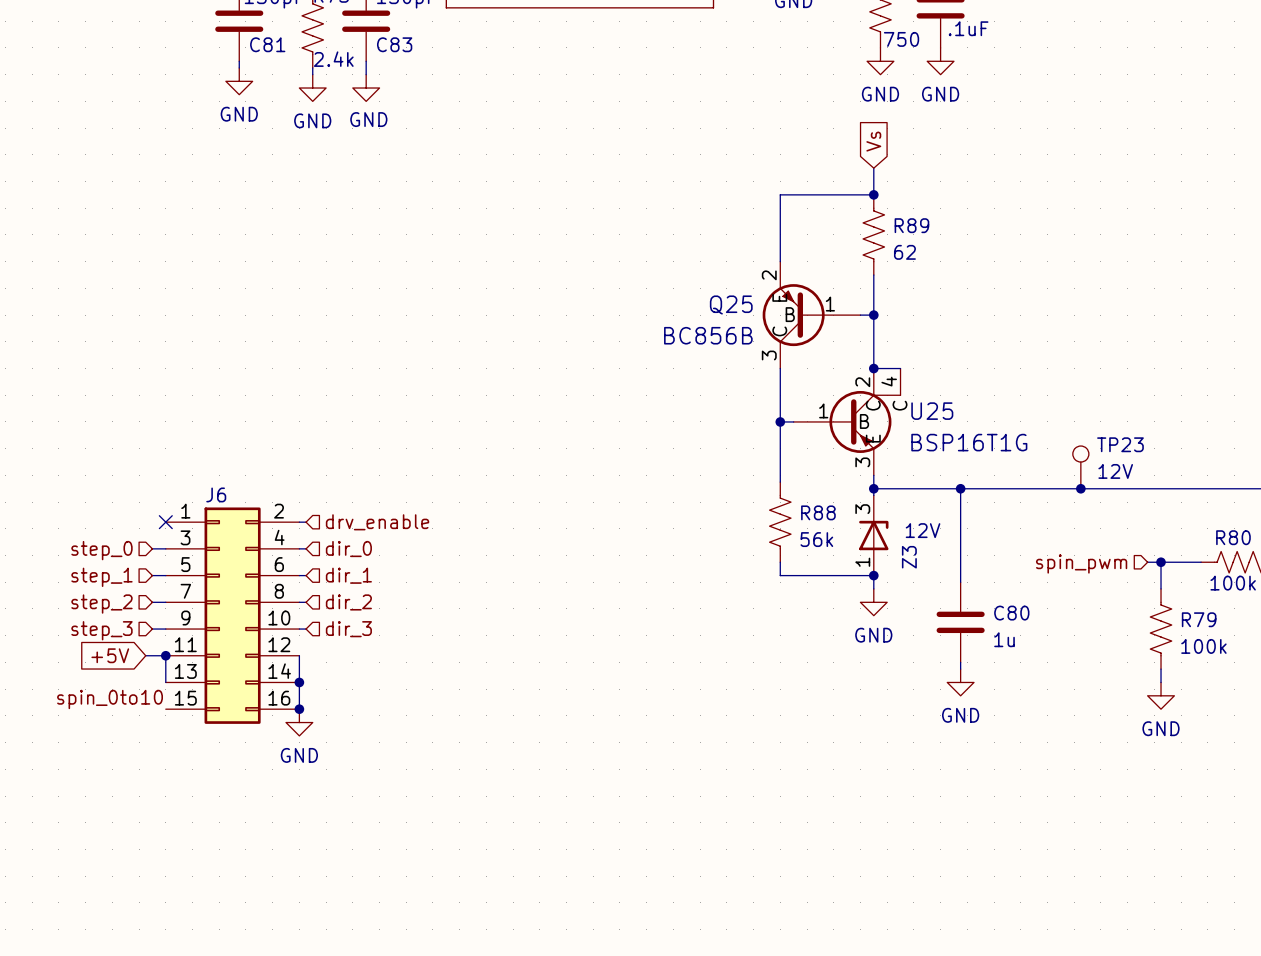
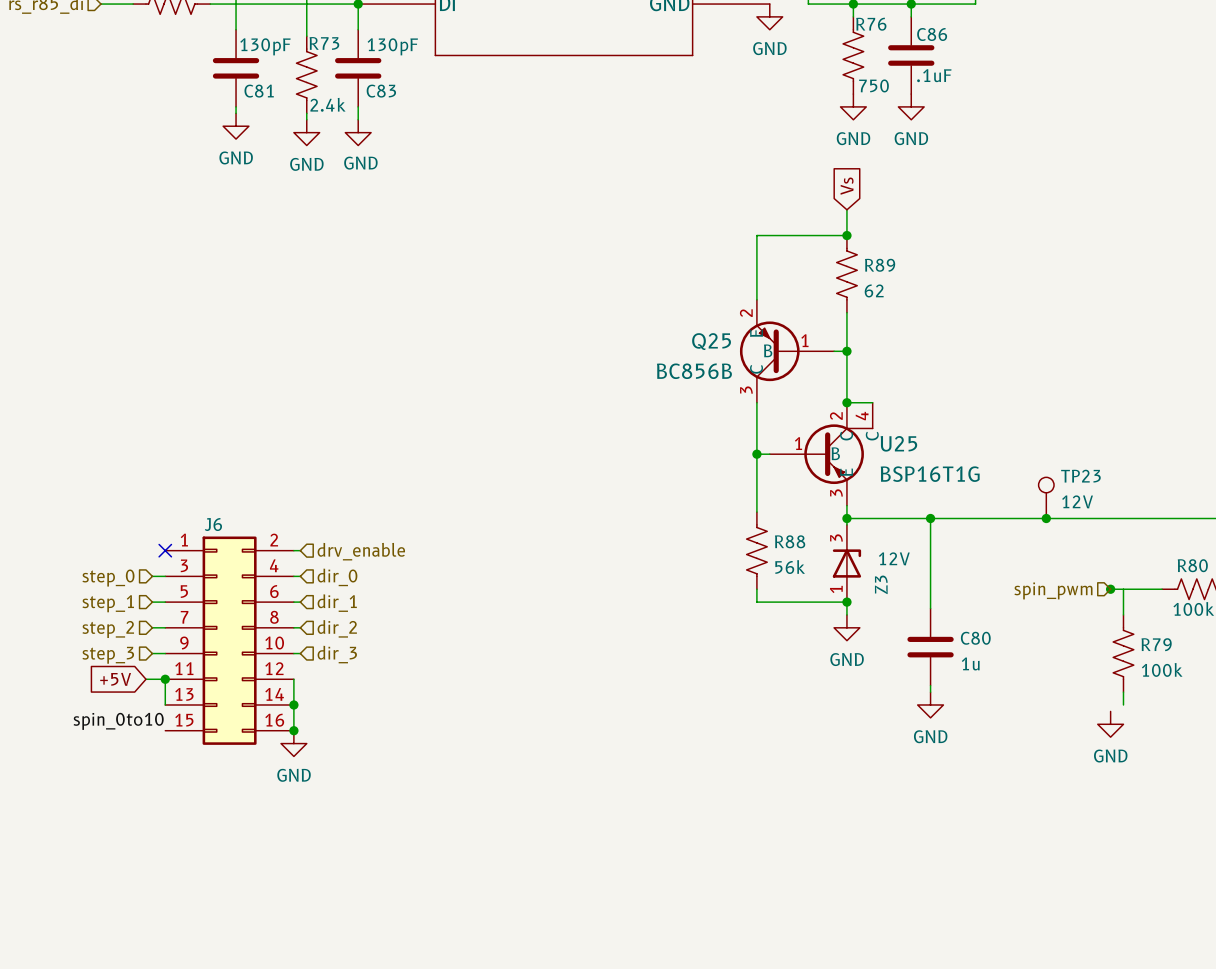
junction position: (1161, 562) -> (1110, 589)
power symbol position: GND (1161, 695) -> GND (1110, 724)

